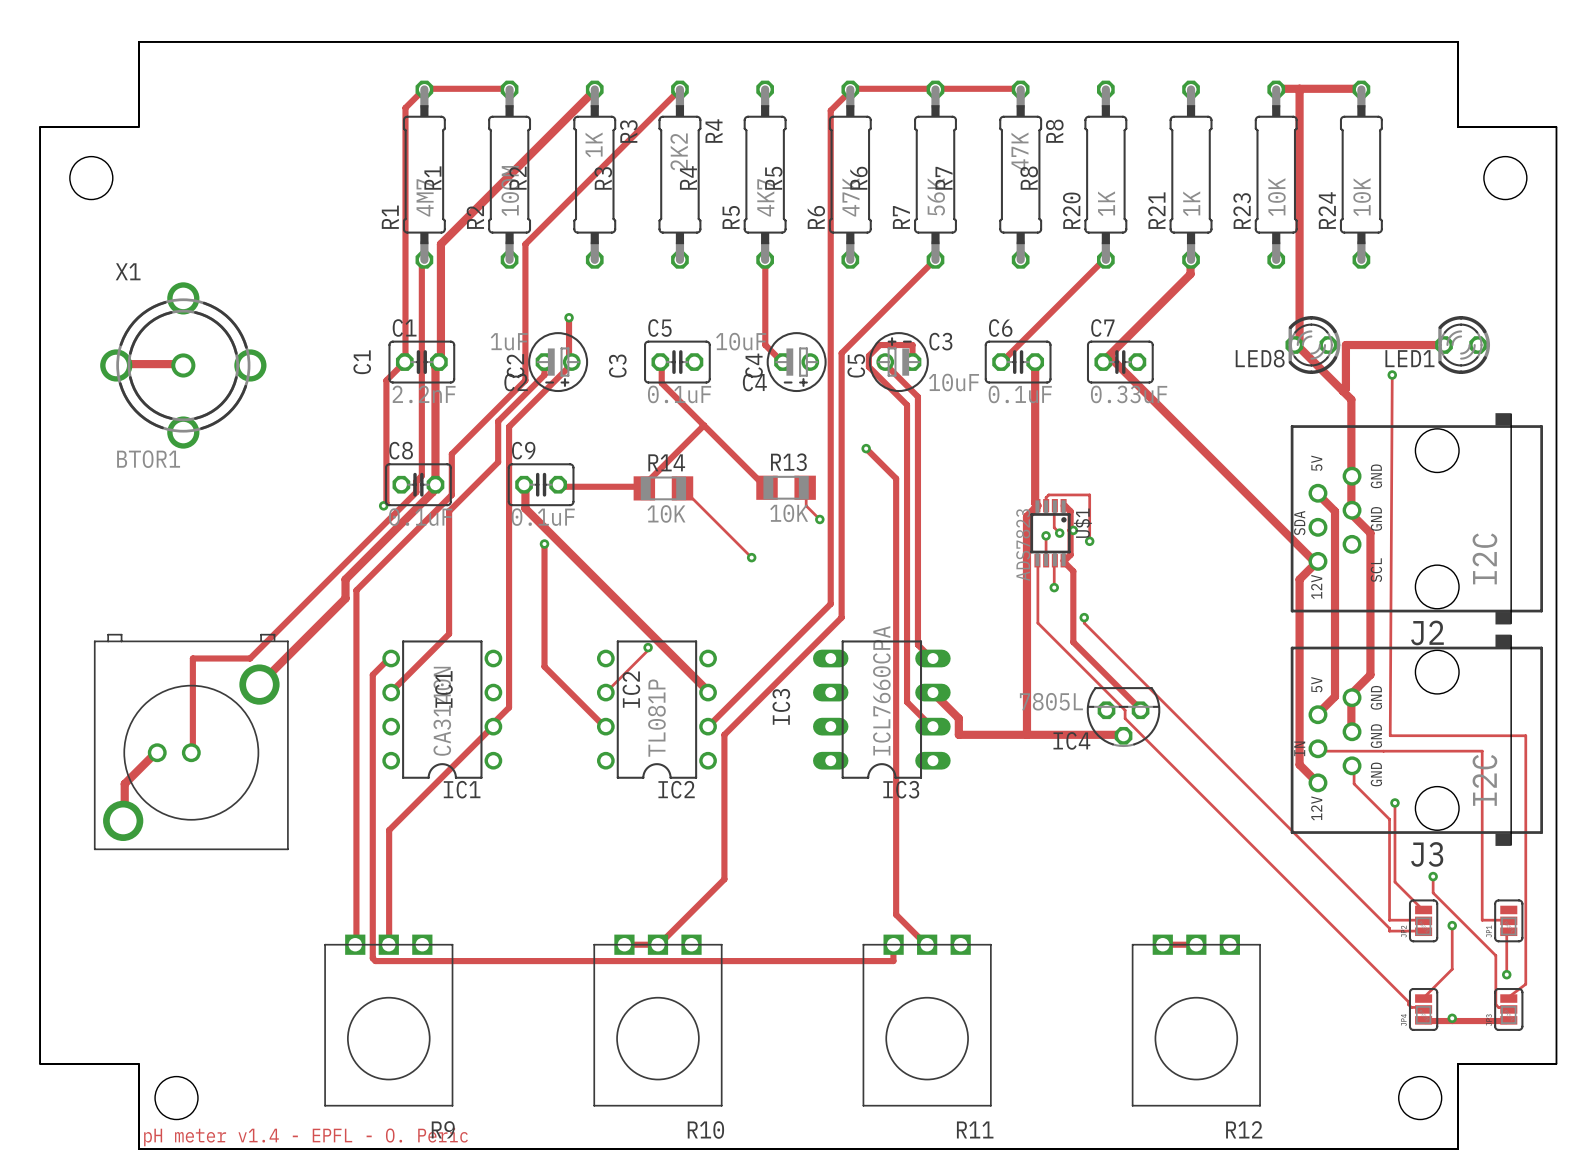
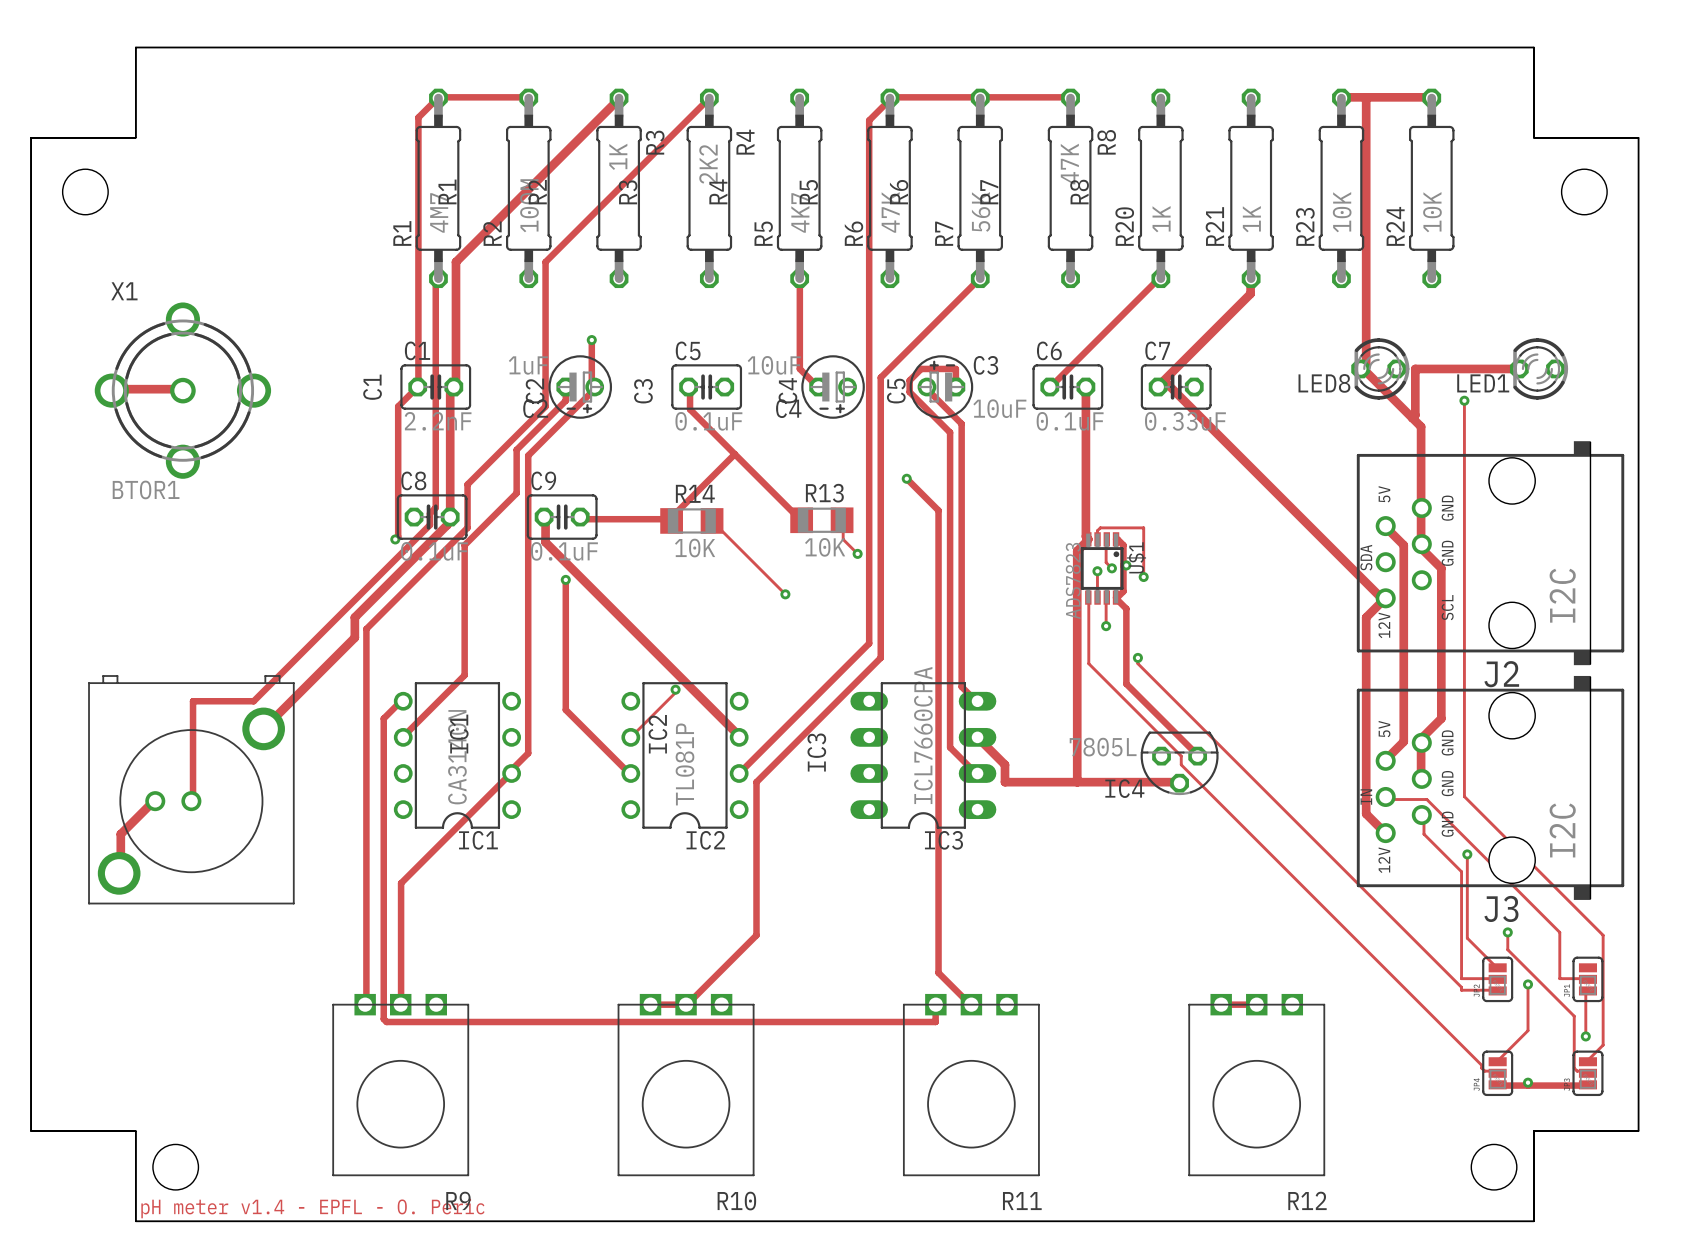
track: (1392, 375) (1390, 735) (1525, 735) (1525, 984) (1509, 996) -> (1464, 400) (1464, 796) (1603, 935) (1603, 1045) (1588, 1059)
track: (1356, 751) (1482, 751) (1482, 876) -> (1426, 799) (1559, 932)

